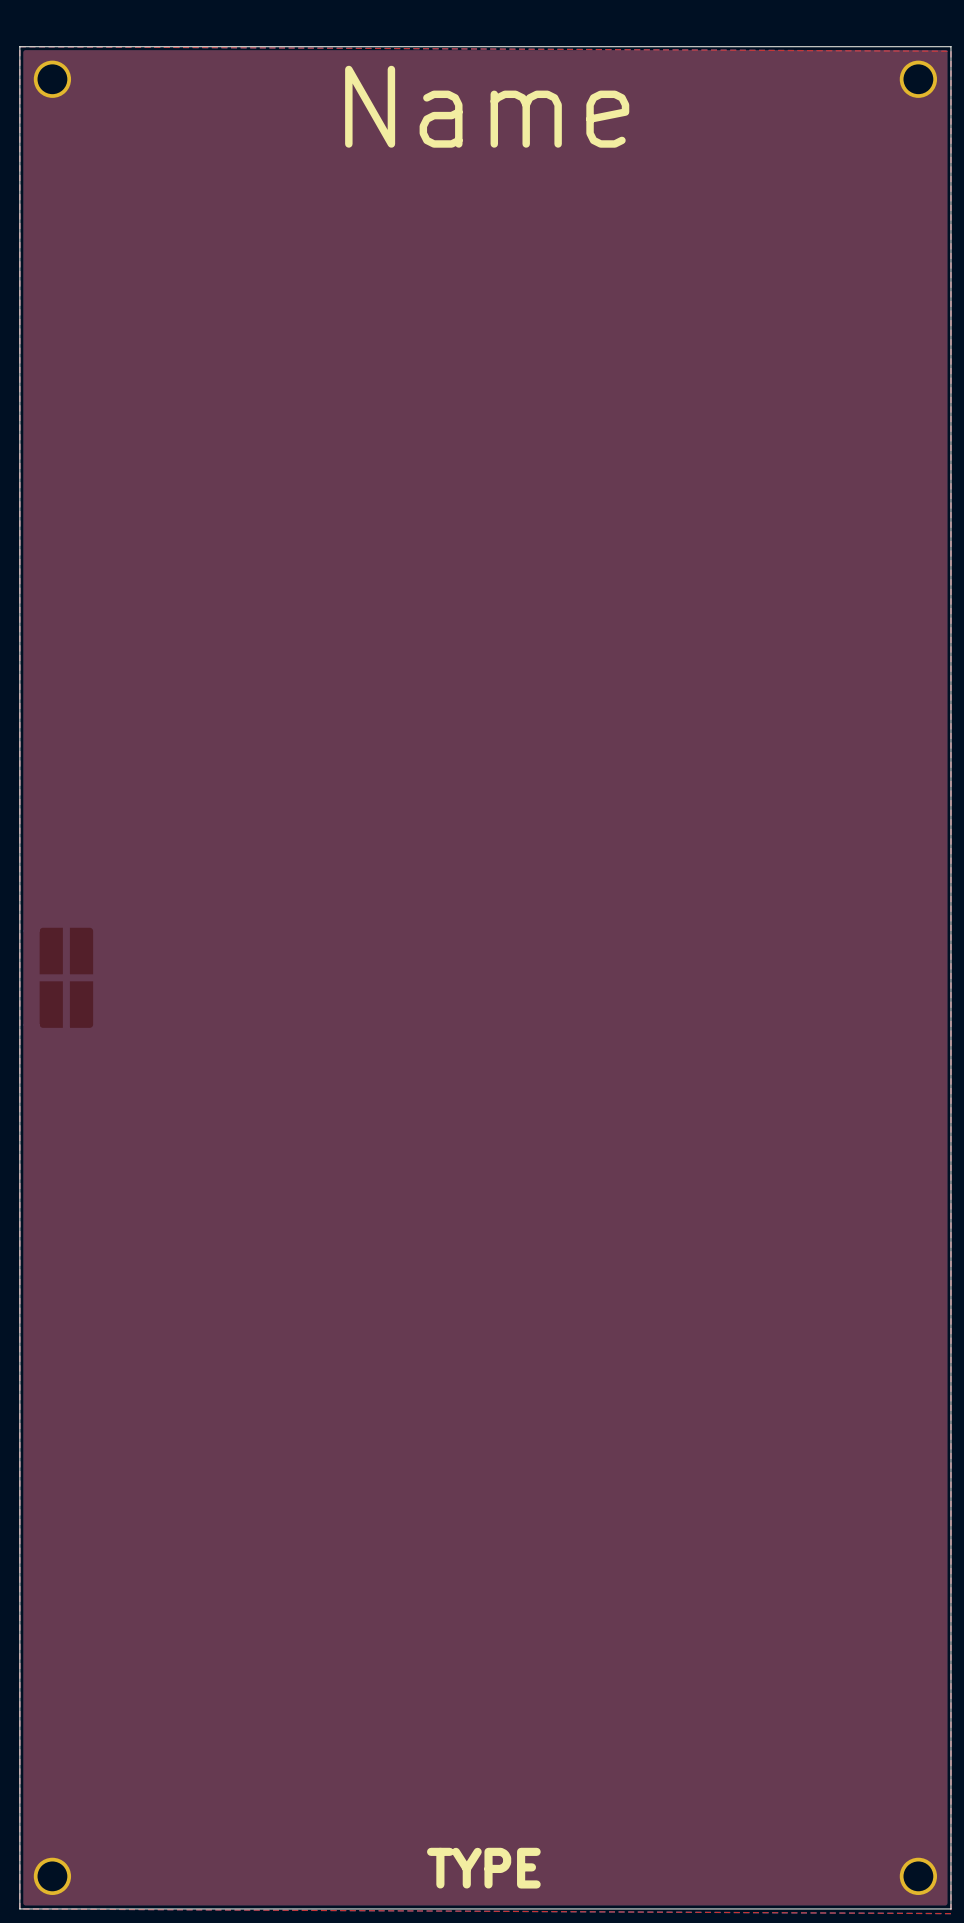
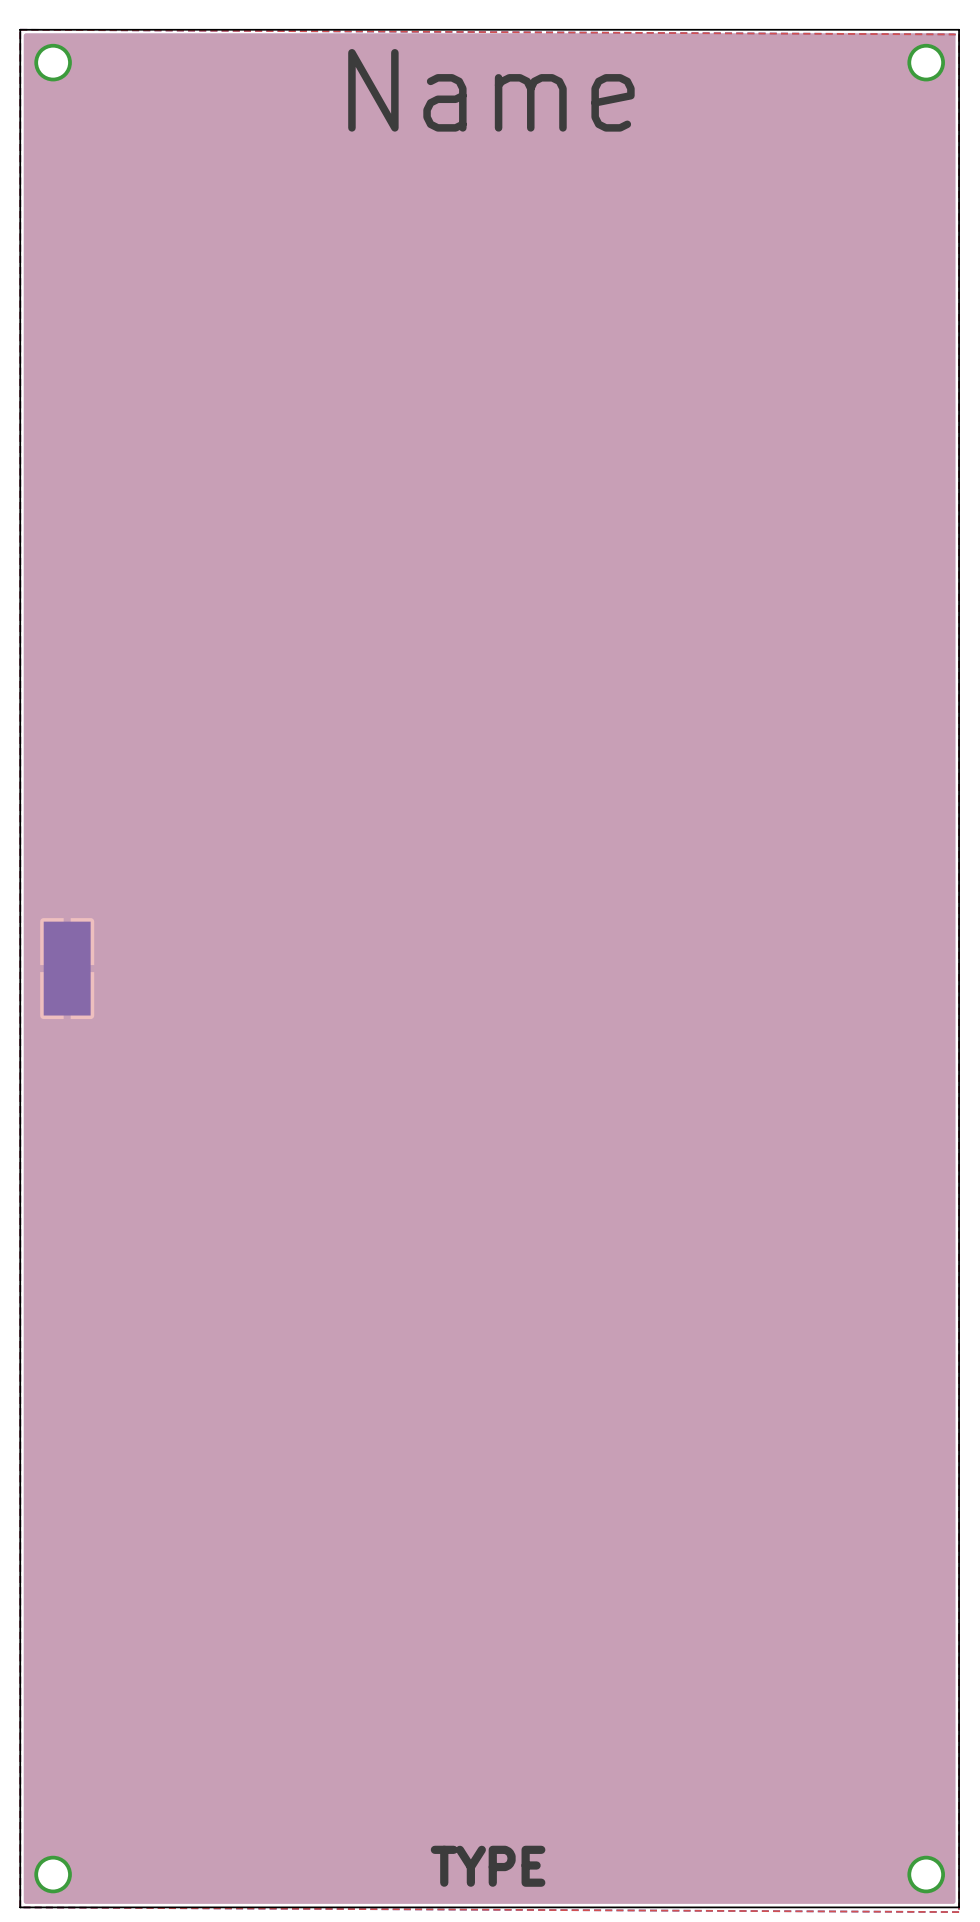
part: none -> (67, 968)

